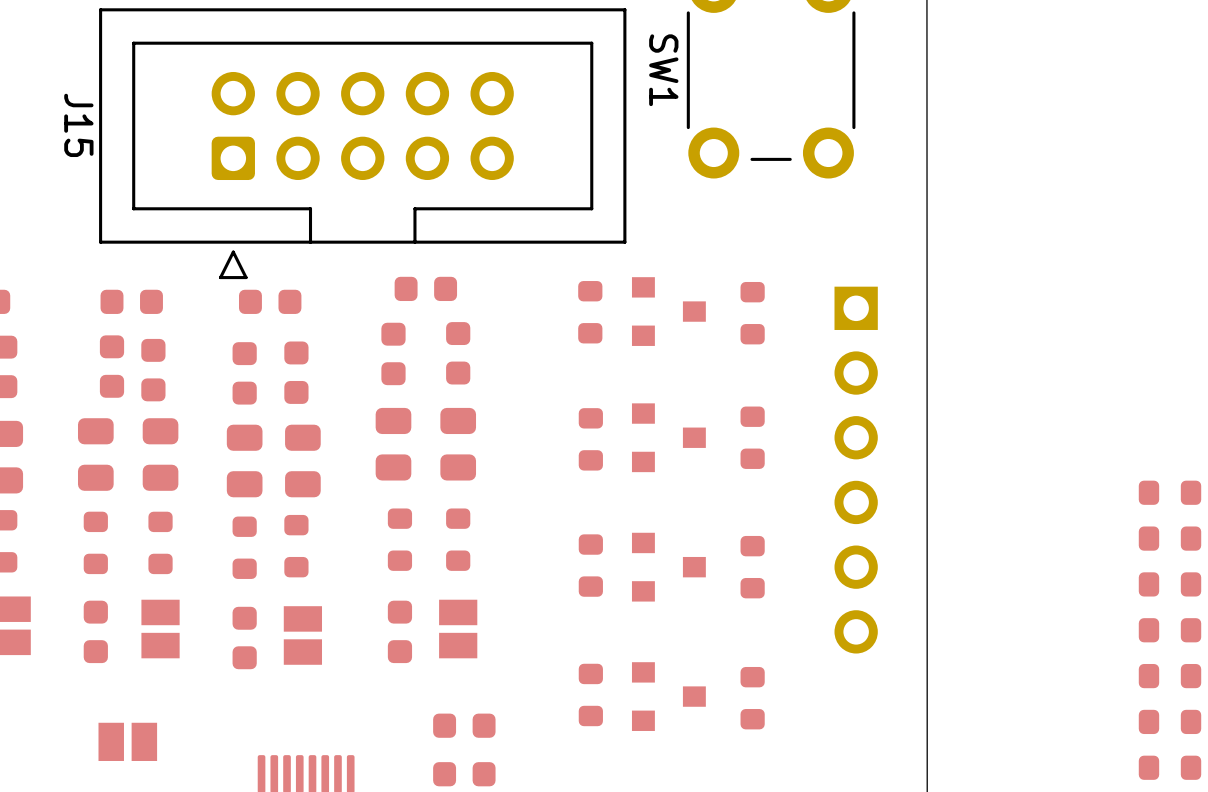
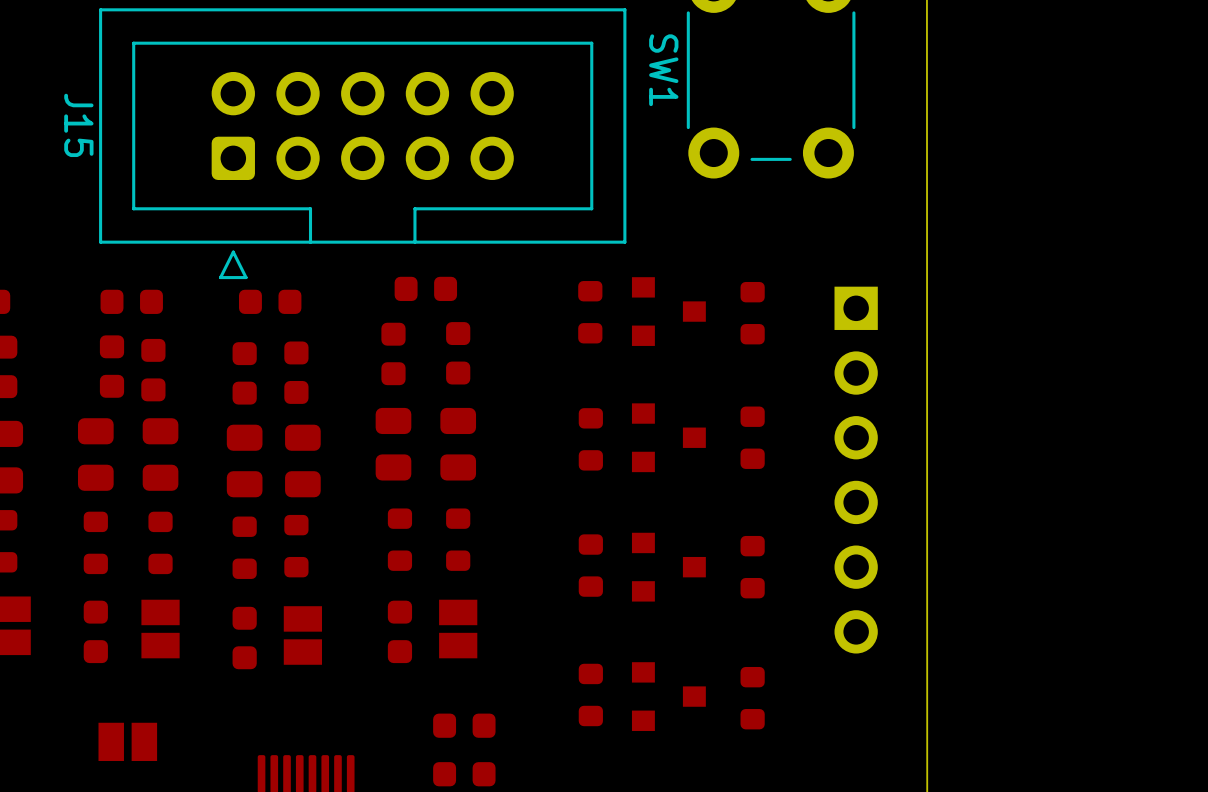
part: (1169, 492) -> none
part: (1169, 538) -> none
part: (1169, 584) -> none
part: (1169, 630) -> none
part: (1169, 676) -> none
part: (1169, 721) -> none
part: (1169, 767) -> none

